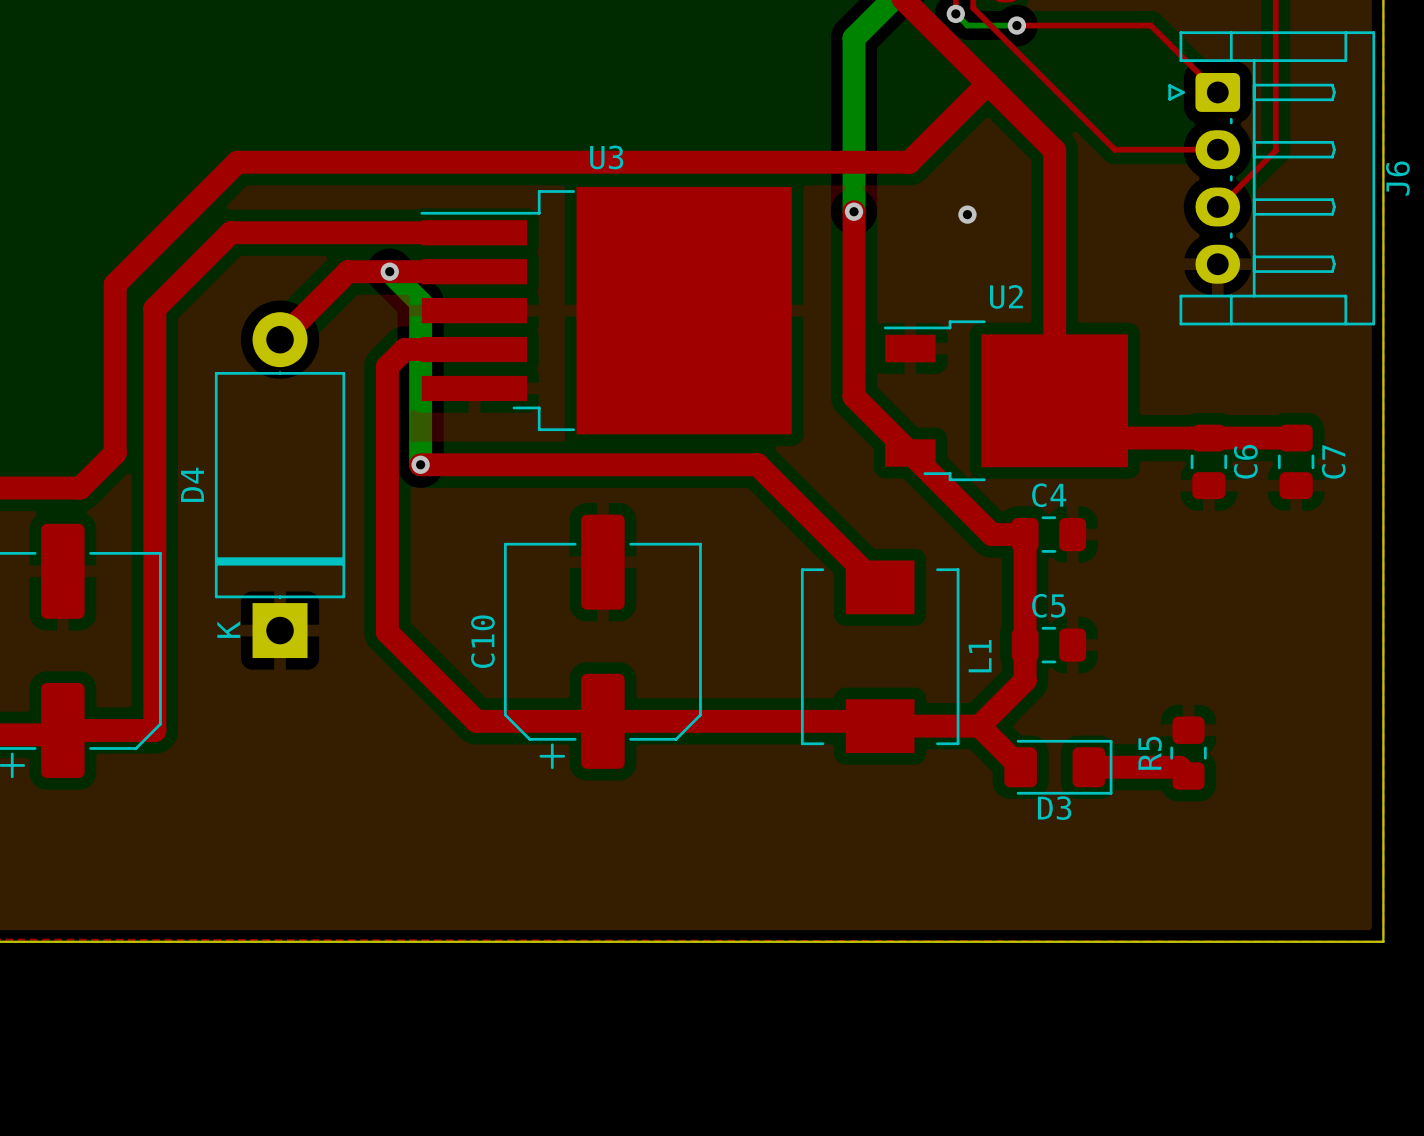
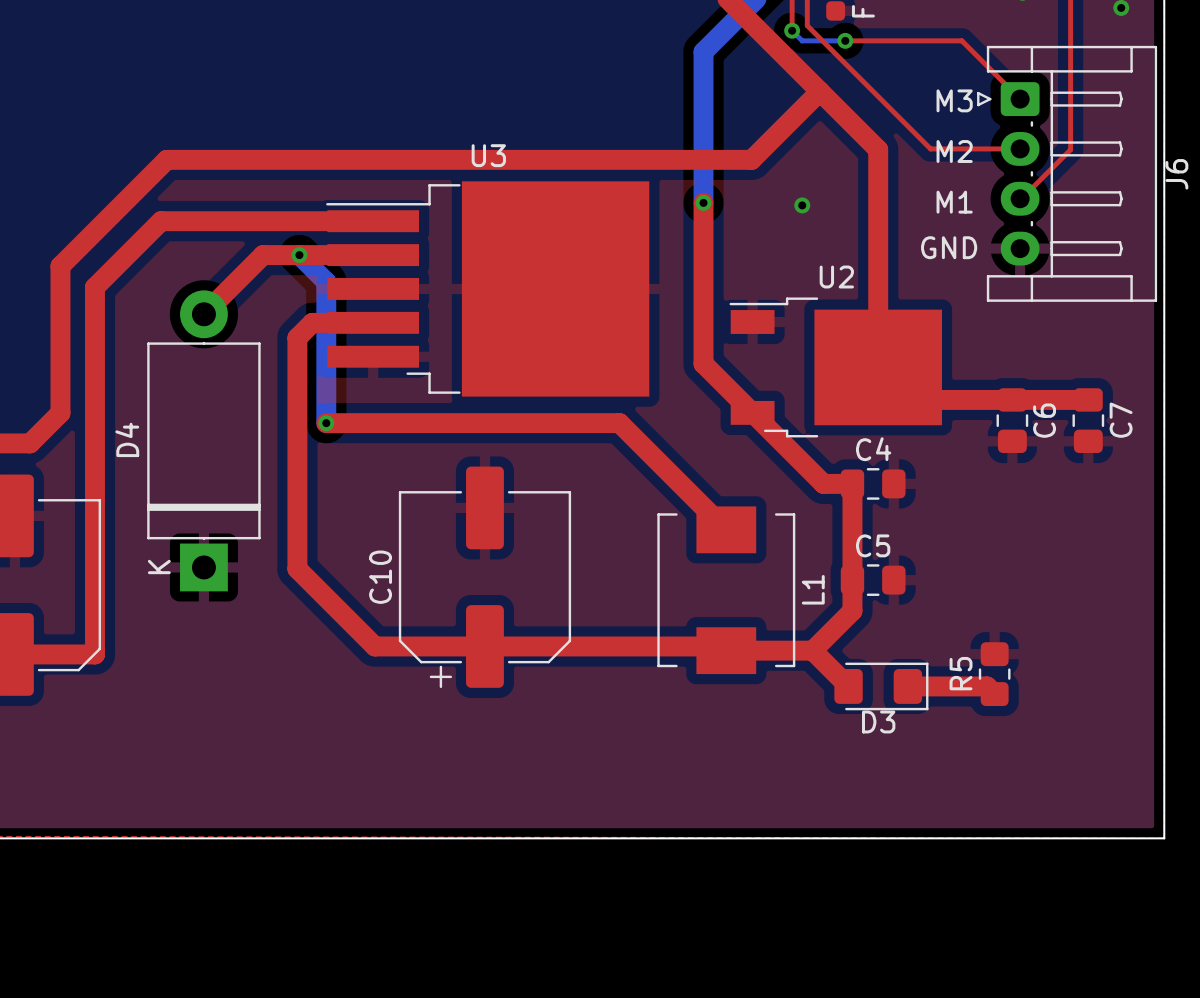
text: none -> M3 (954, 100)
text: none -> M2 (954, 151)
text: none -> M1 (954, 202)
text: none -> GND (949, 247)

